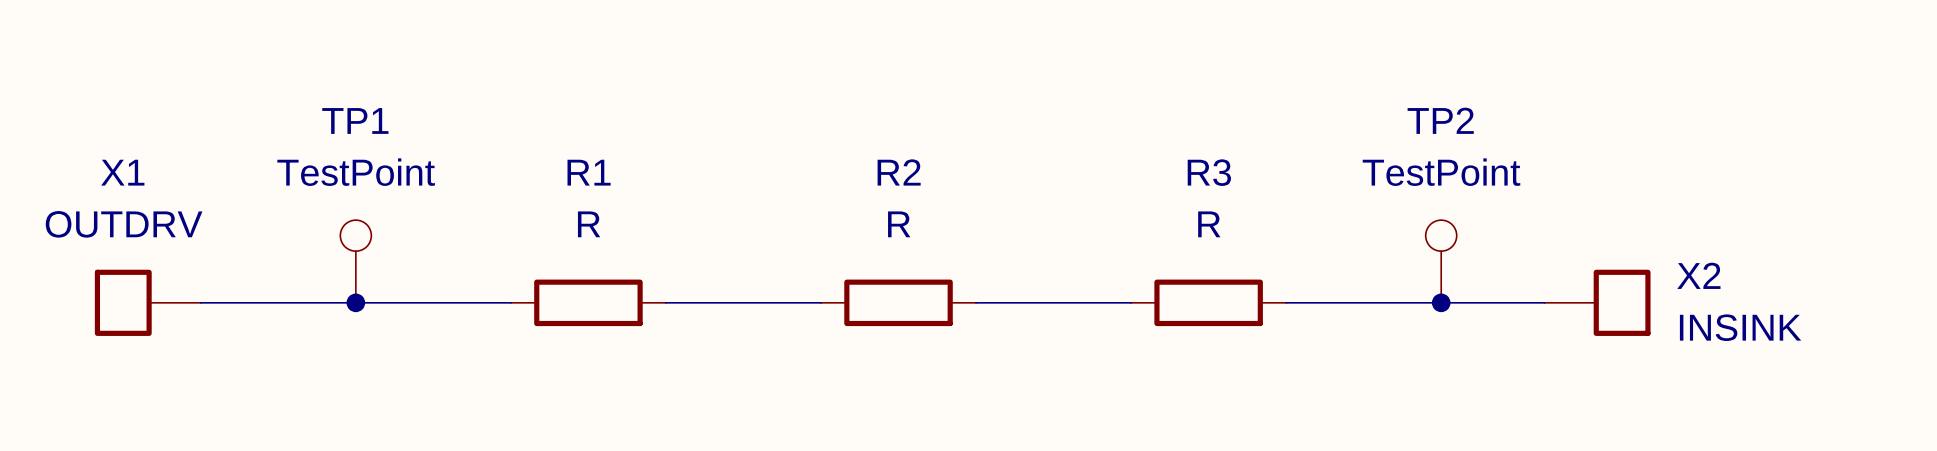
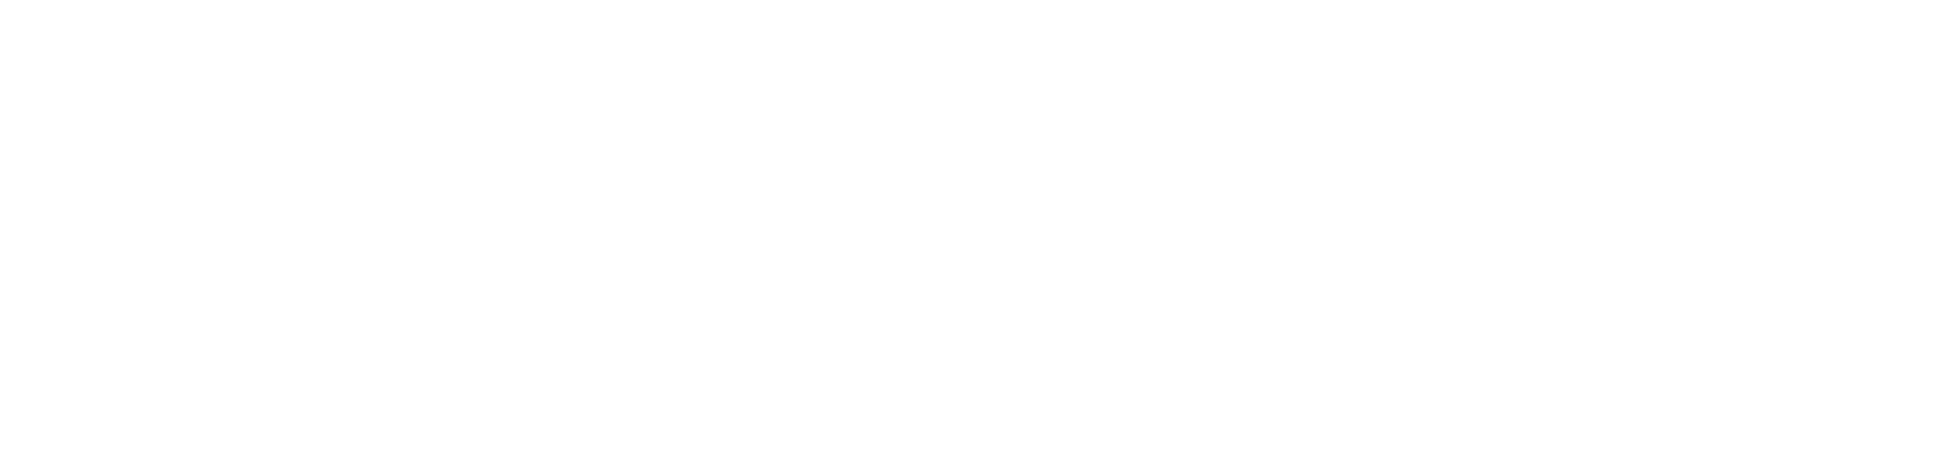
TP1: TestPoint (355, 261) -> none
TP2: TestPoint (1441, 261) -> none
X1: OUTDRV (147, 302) -> none
wire: (200, 302) (510, 302) -> none
junction: (355, 302) -> none
R1: R (588, 302) -> none
wire: (665, 302) (821, 302) -> none
R2: R (898, 302) -> none
wire: (976, 302) (1131, 302) -> none
R3: R (1208, 302) -> none
wire: (1286, 302) (1544, 302) -> none
junction: (1441, 302) -> none
X2: INSINK (1597, 302) -> none

